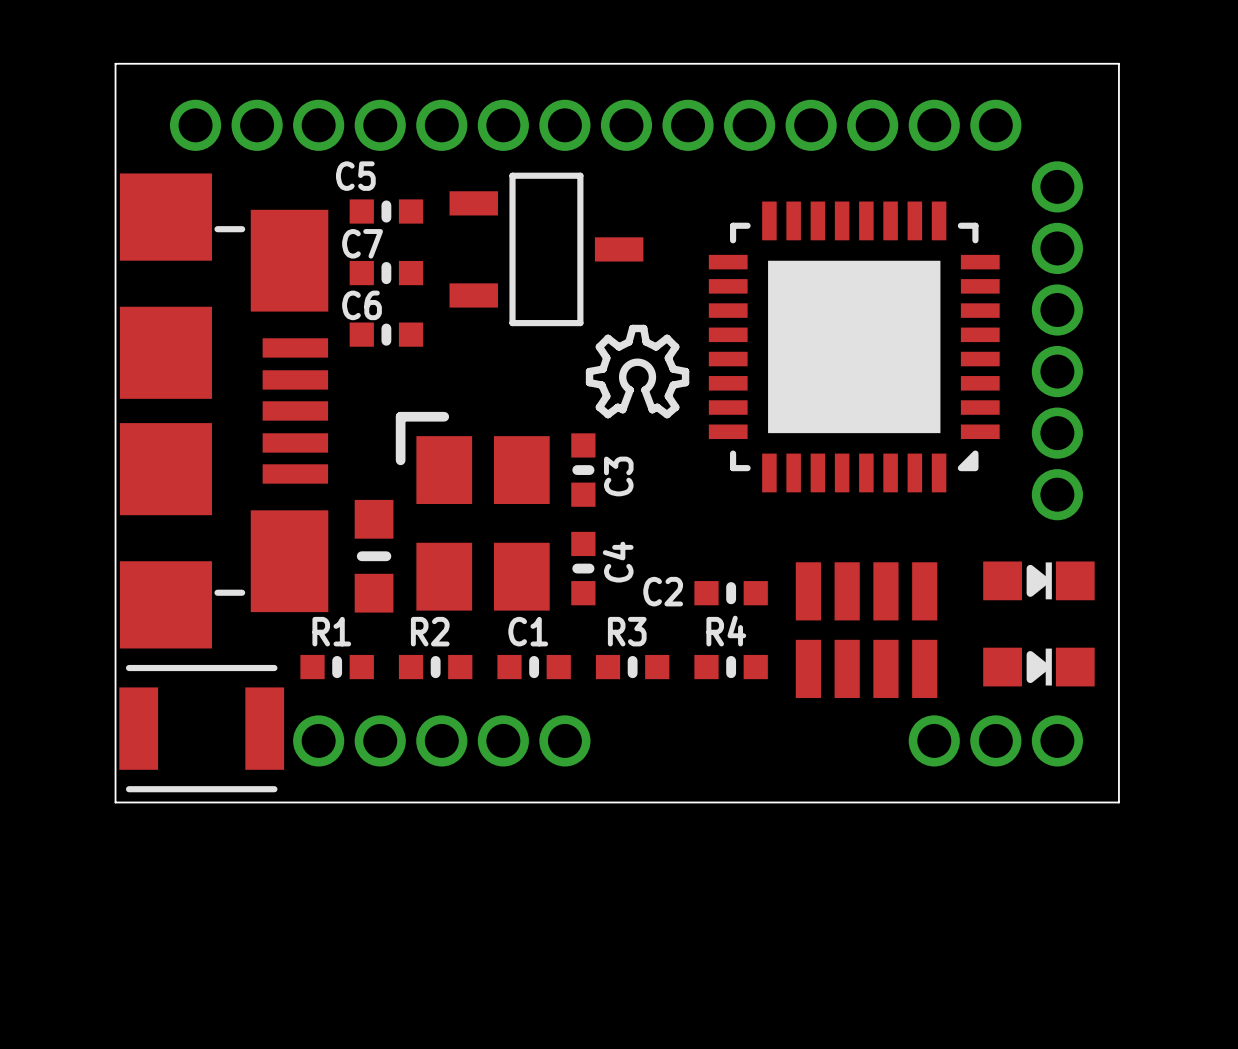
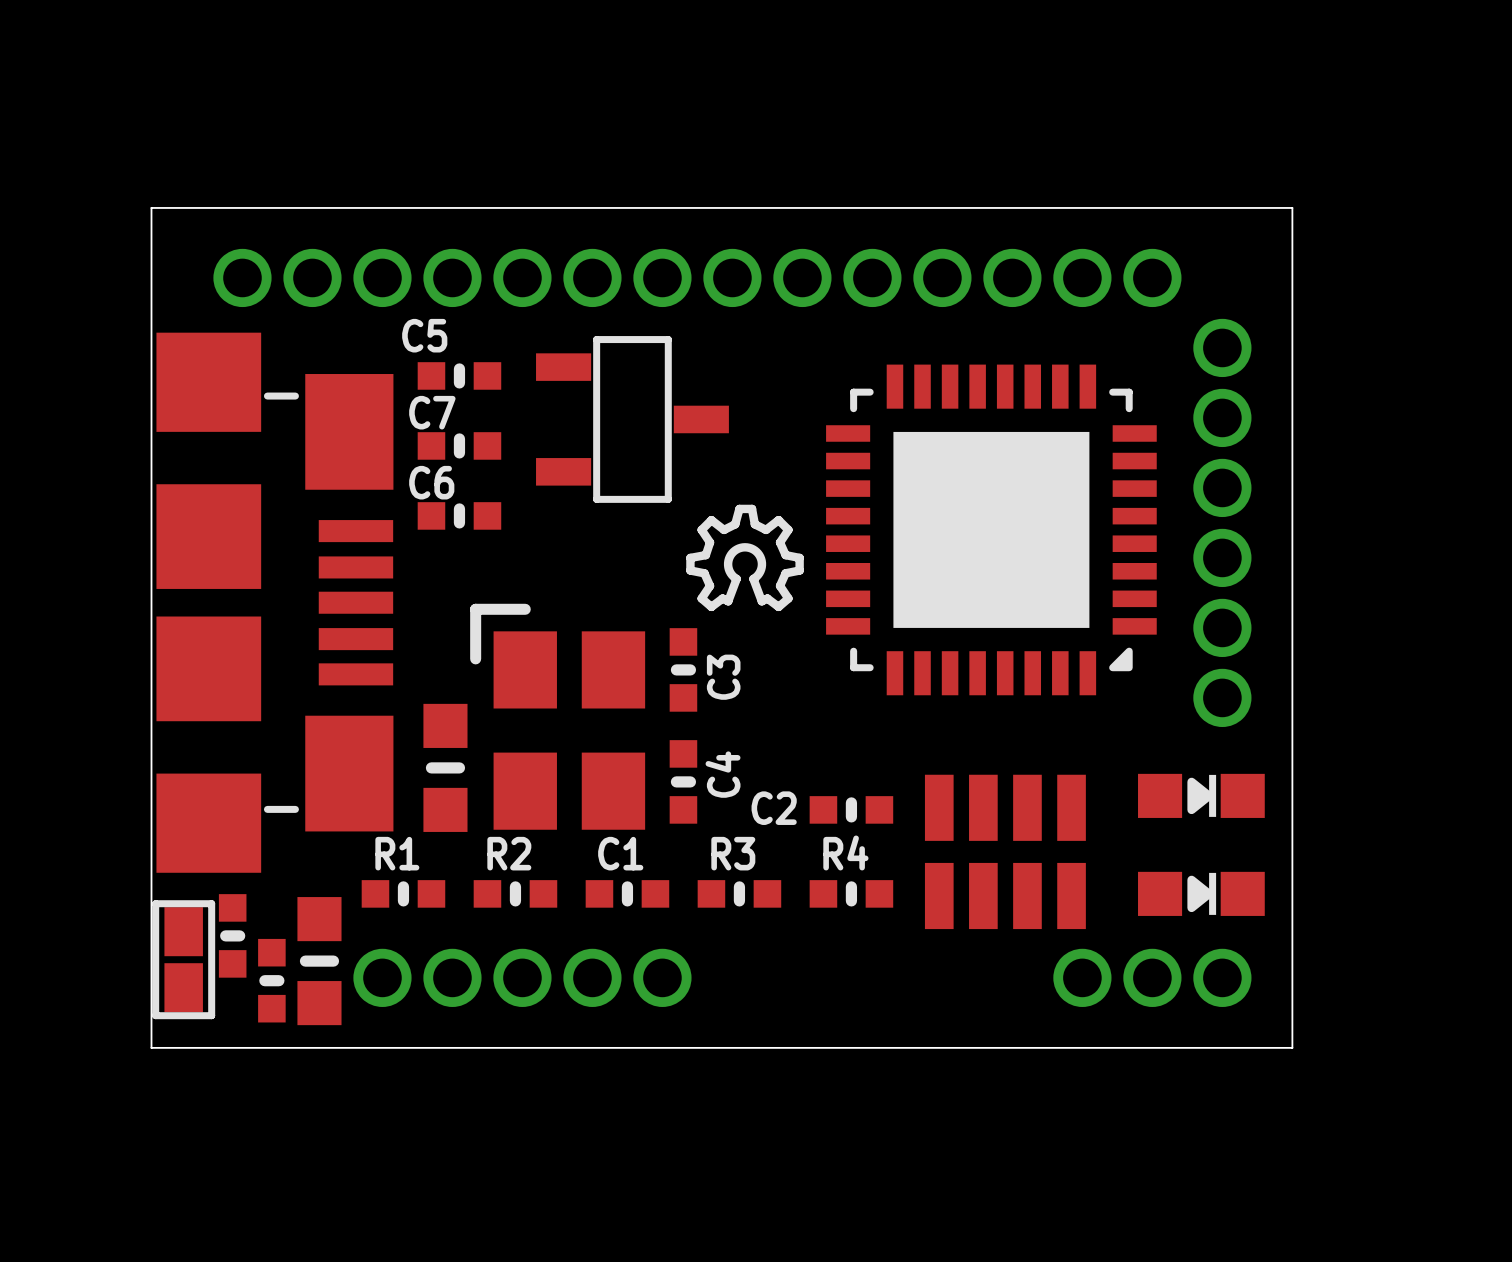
part footprint: [449, 172, 644, 327] -> [536, 336, 729, 503]
part: none -> (232, 935)
part: none -> (183, 959)
part: none -> (319, 961)
part: (201, 728) -> none
part: none -> (271, 980)

